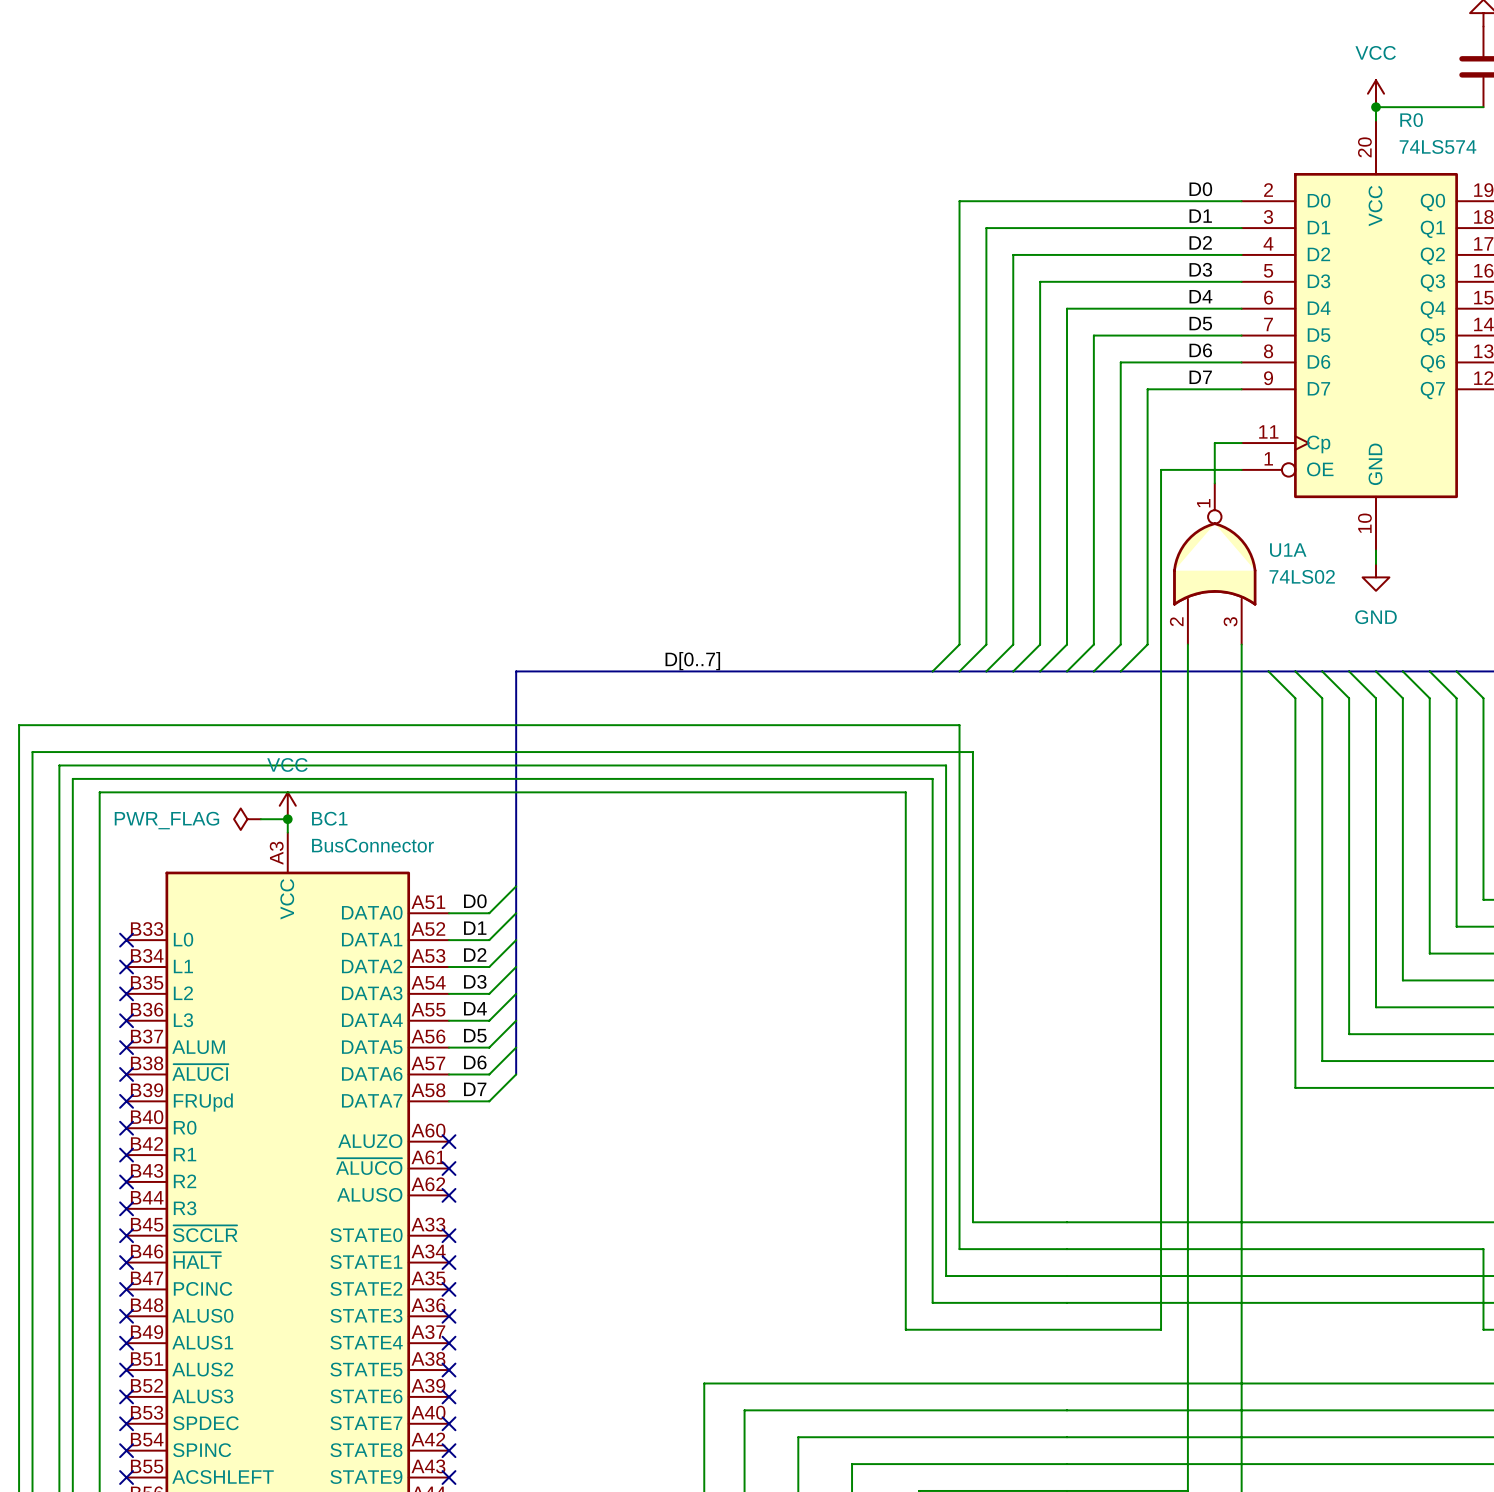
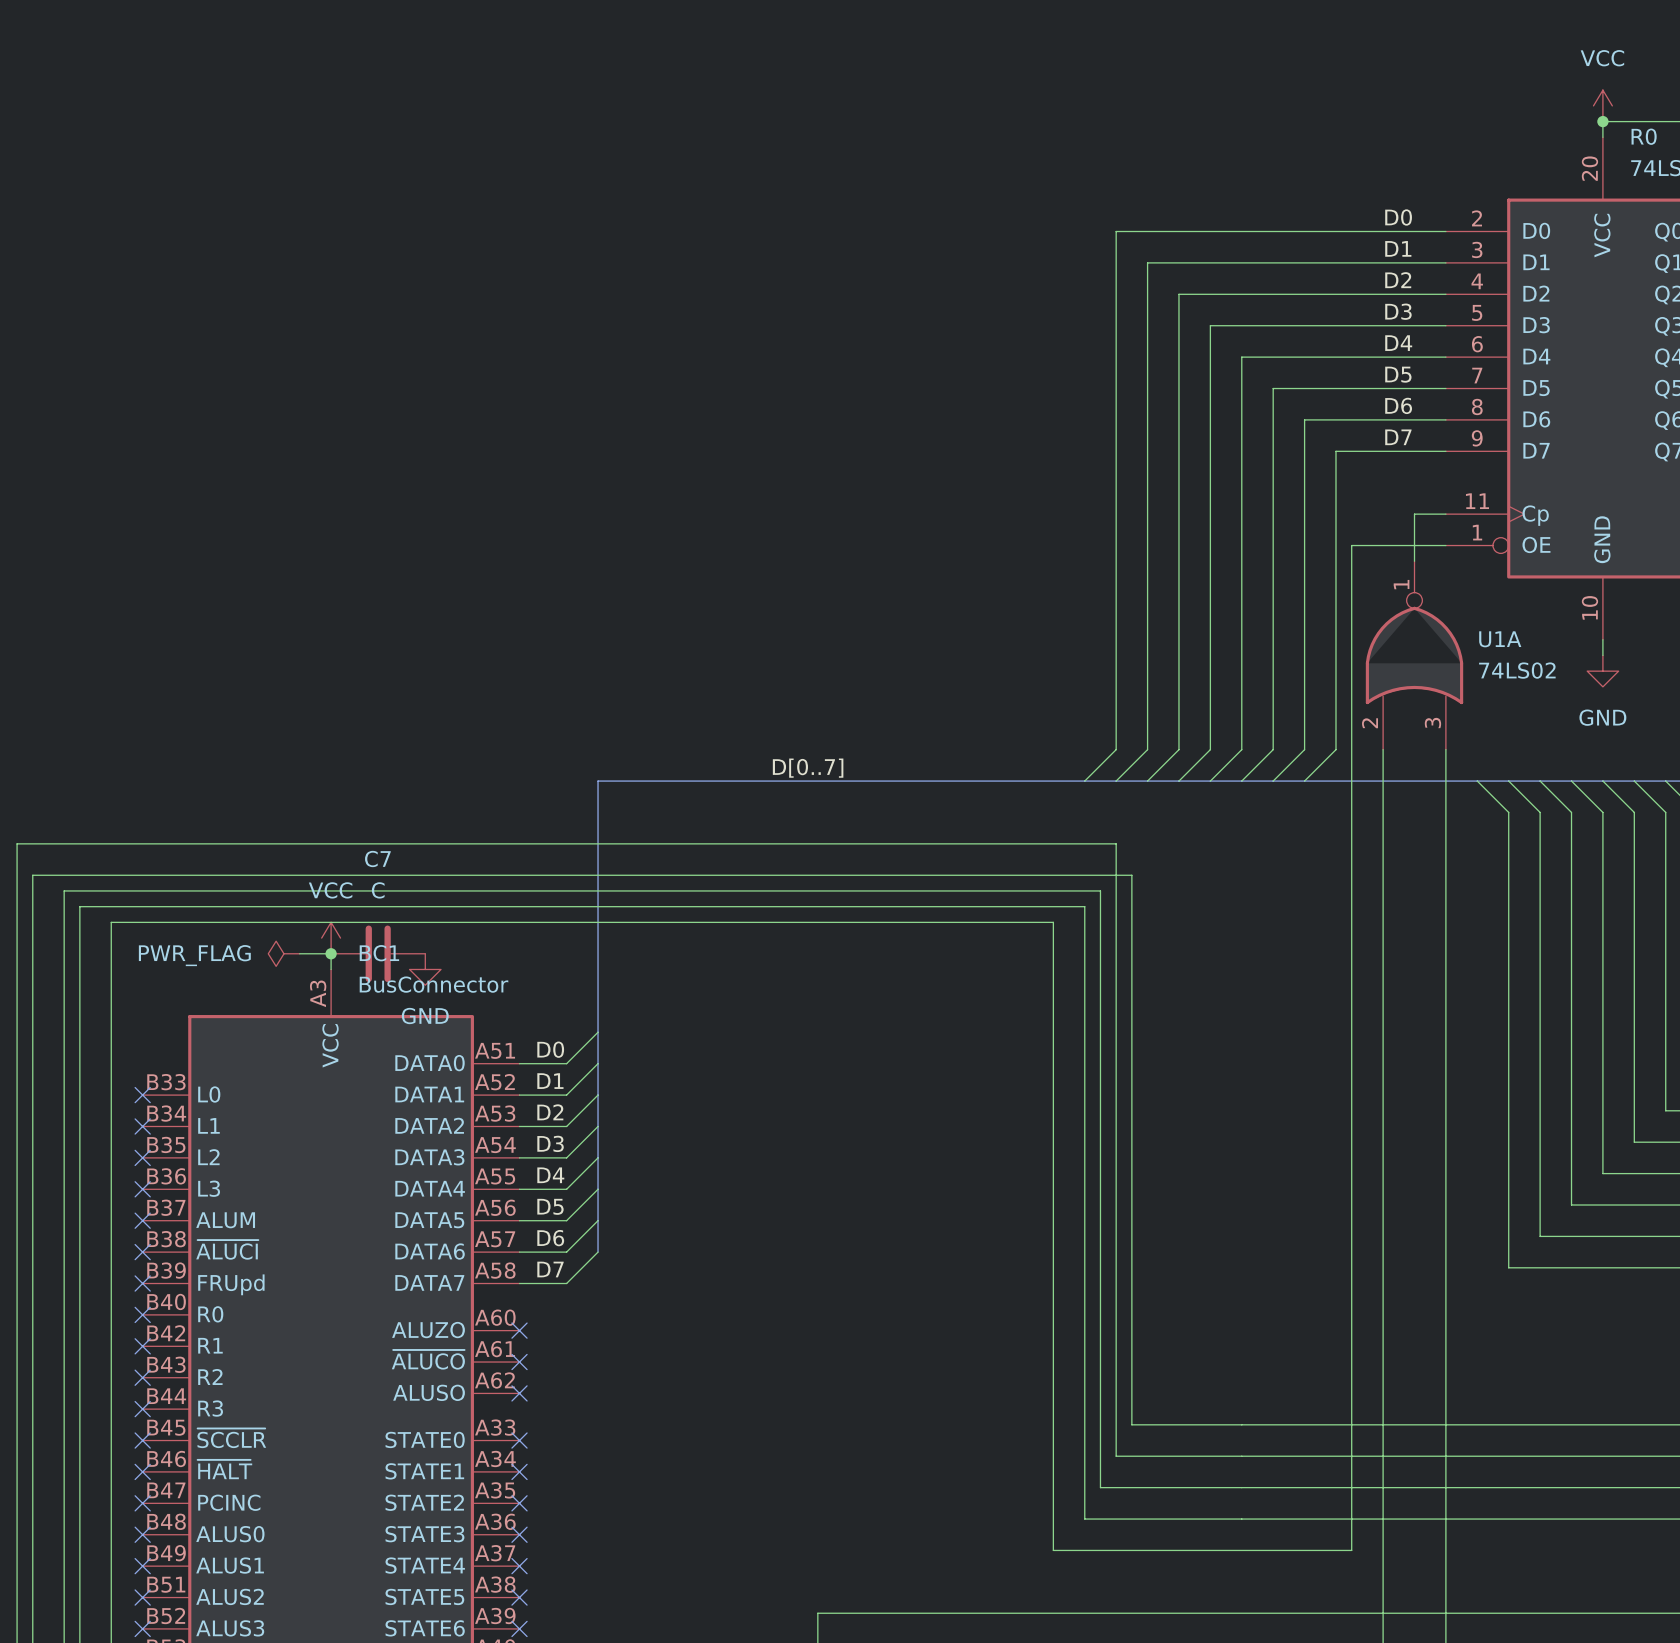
C7: none -> C (378, 953)
power symbol: none -> GND (425, 969)

